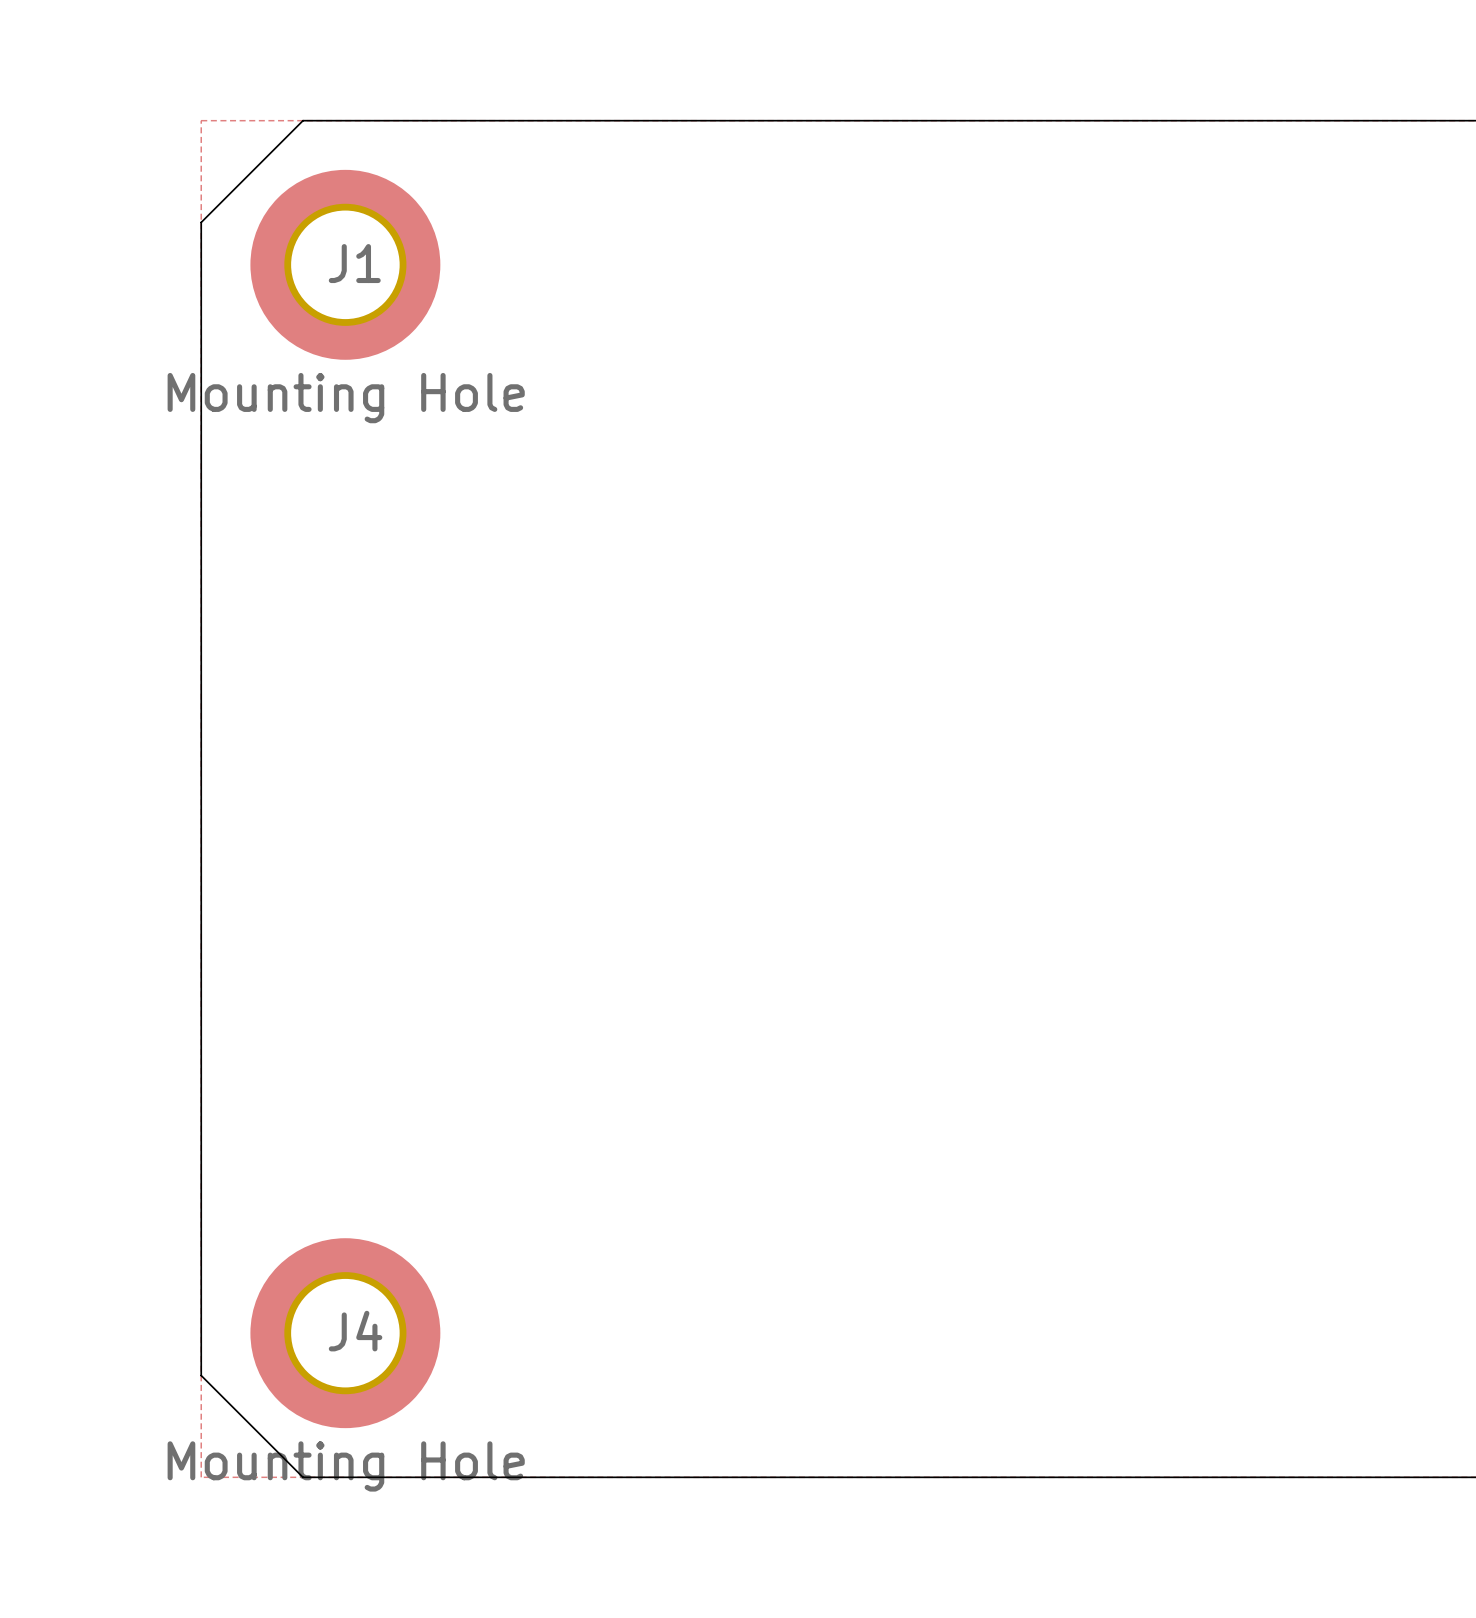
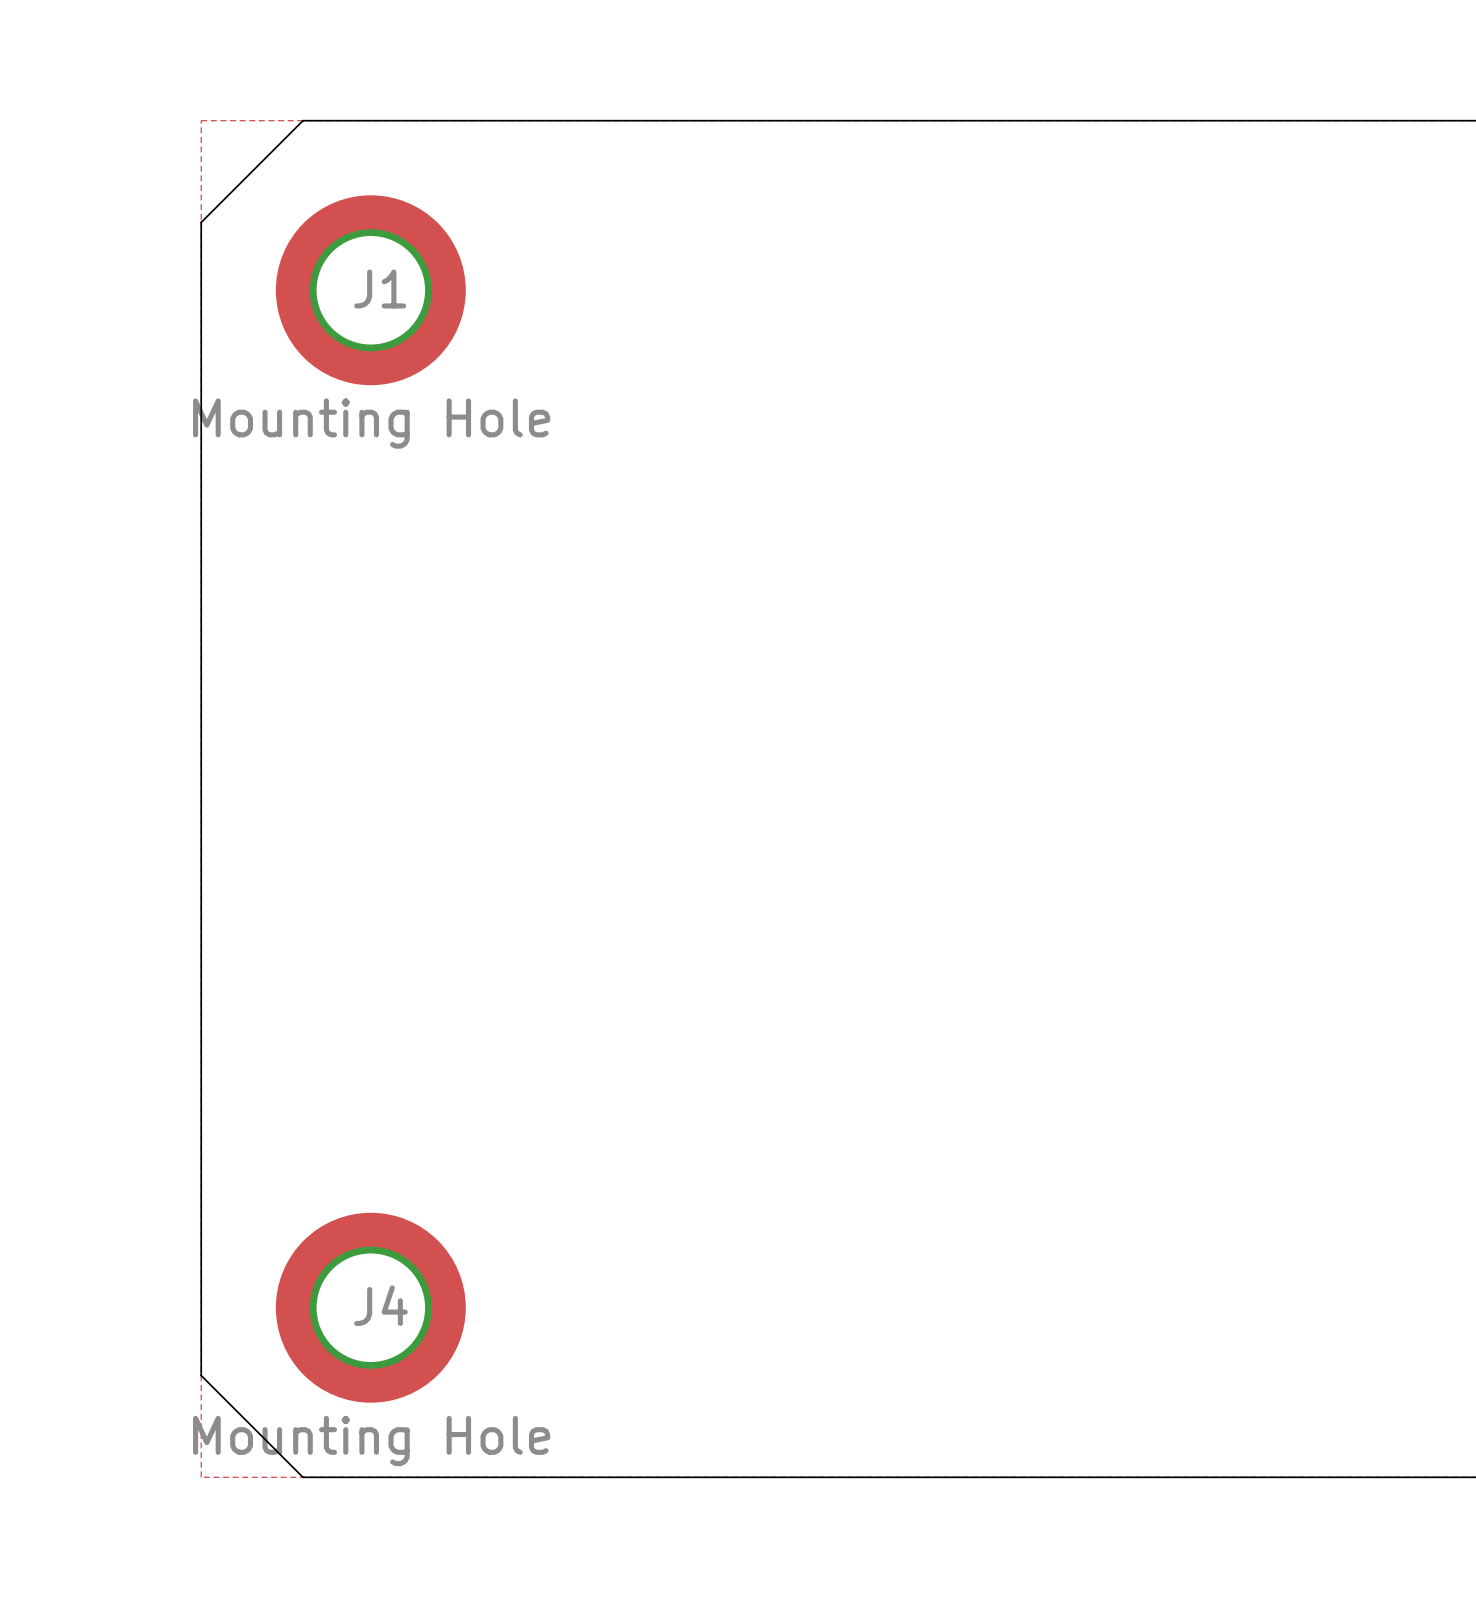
J1 position: (345, 264) -> (370, 290)
J4 position: (345, 1333) -> (370, 1307)

